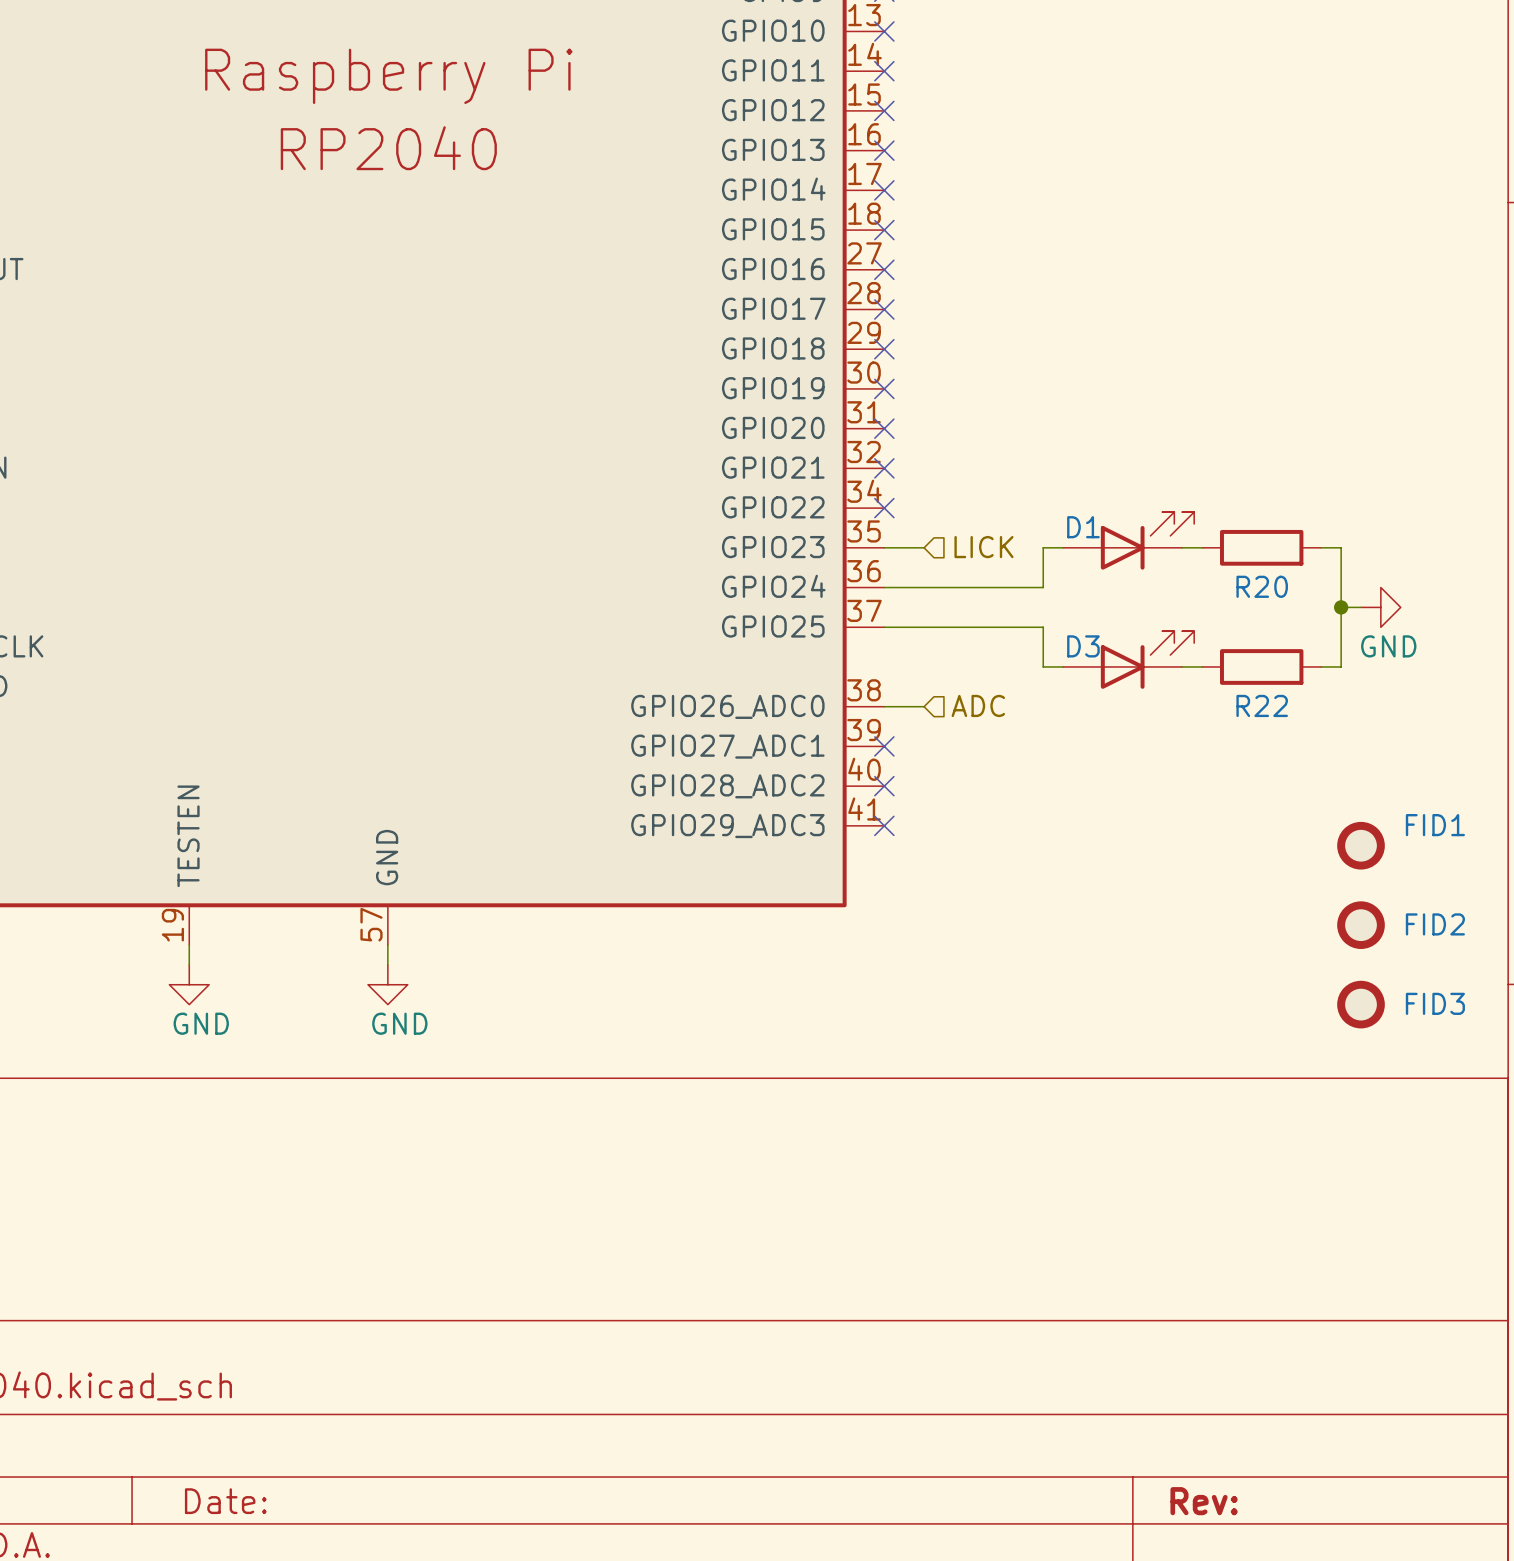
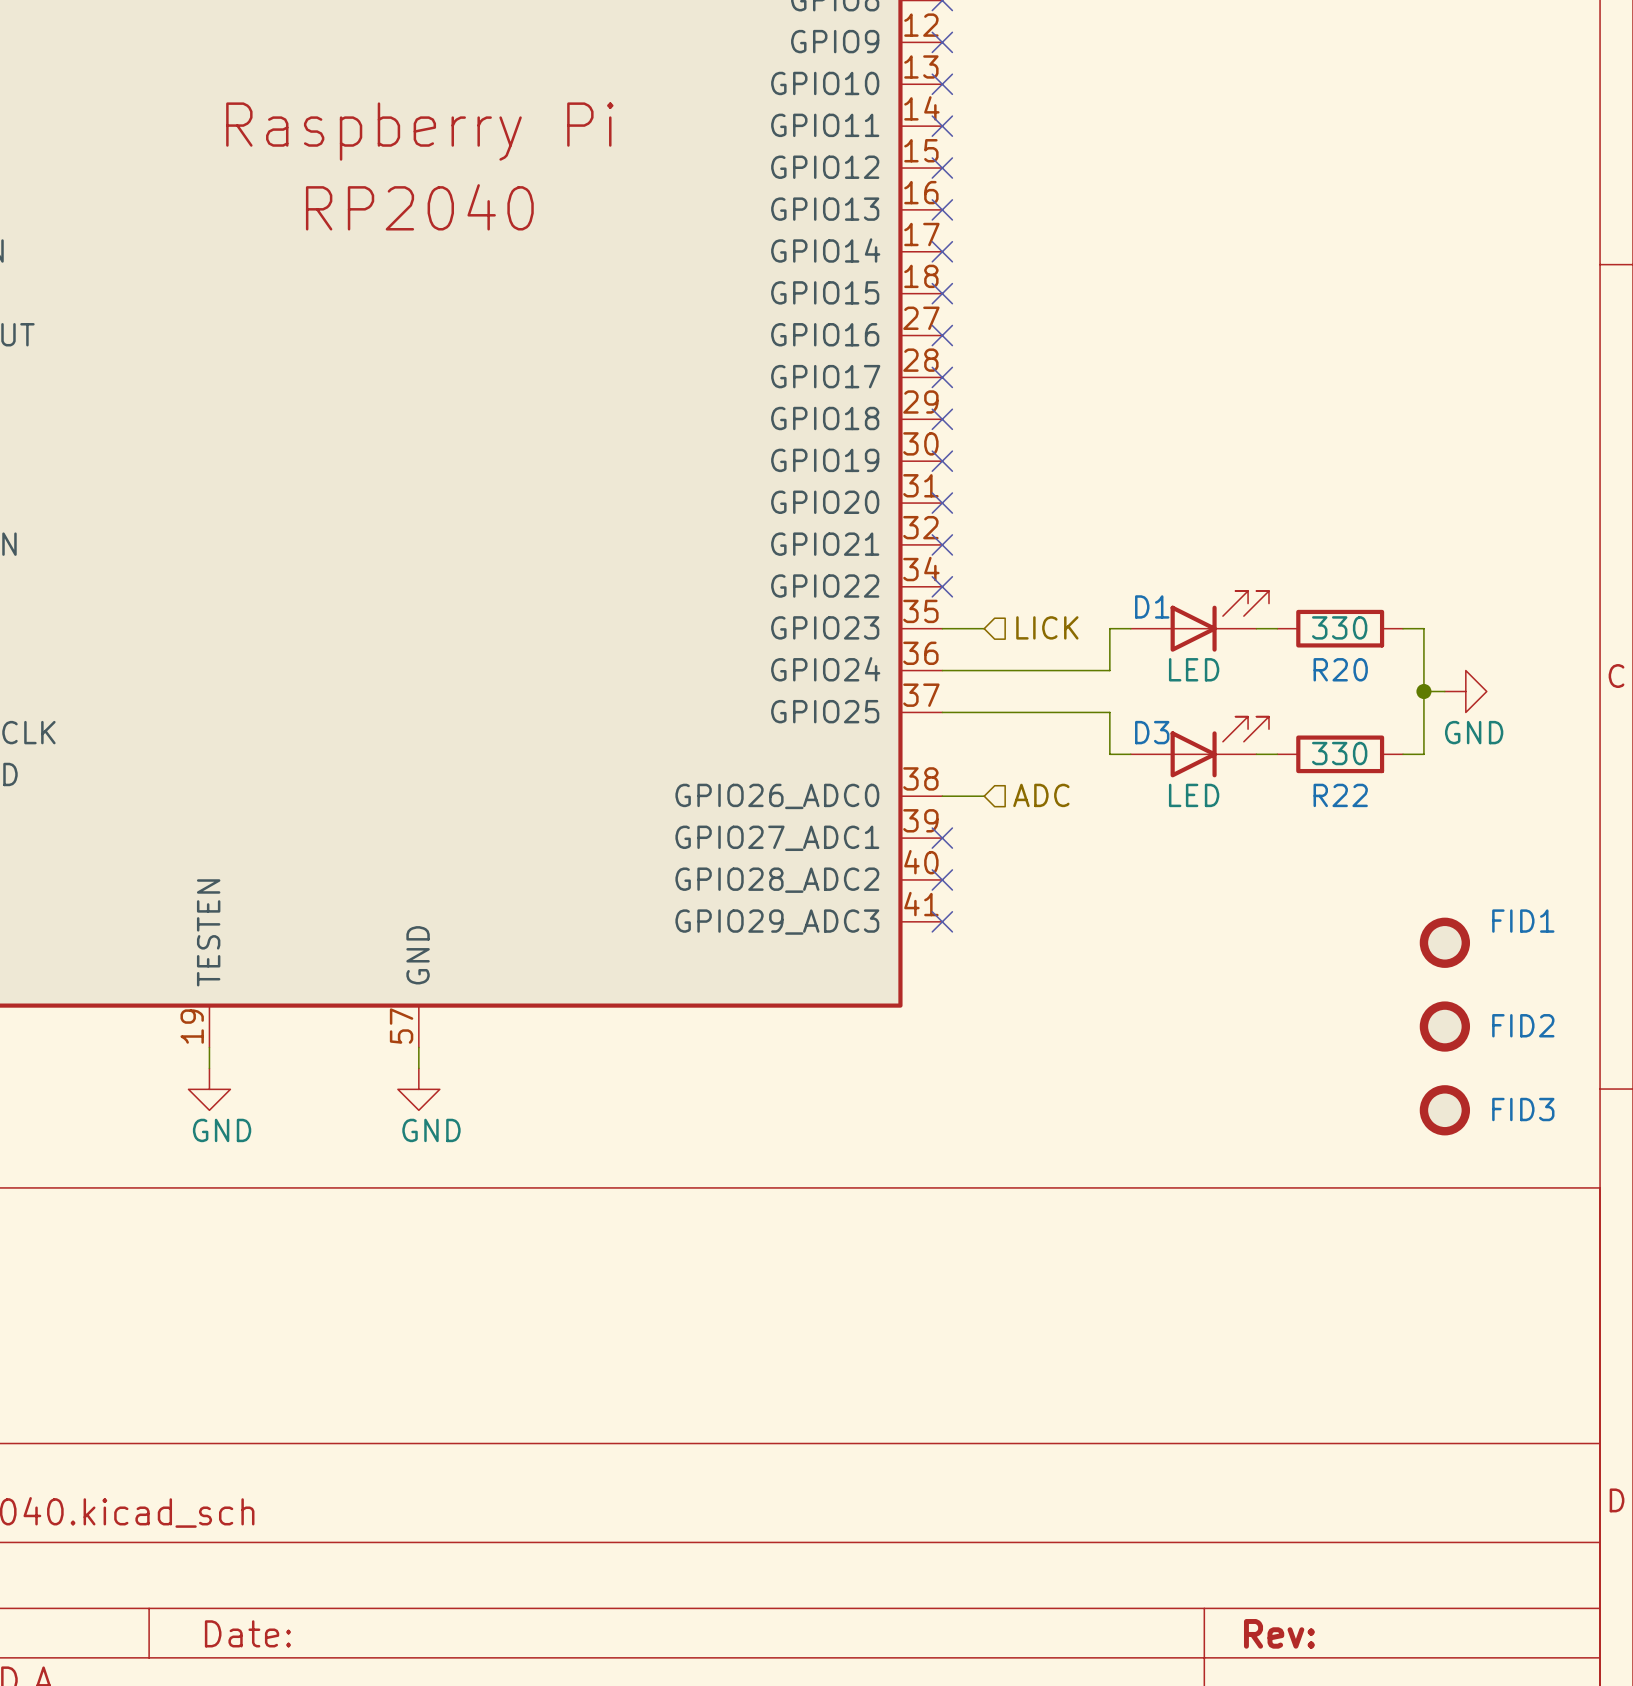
R20 value: none -> 330 (1339, 627)
D1 value: none -> LED (1194, 669)
R22 value: none -> 330 (1339, 753)
D3 value: none -> LED (1194, 795)

